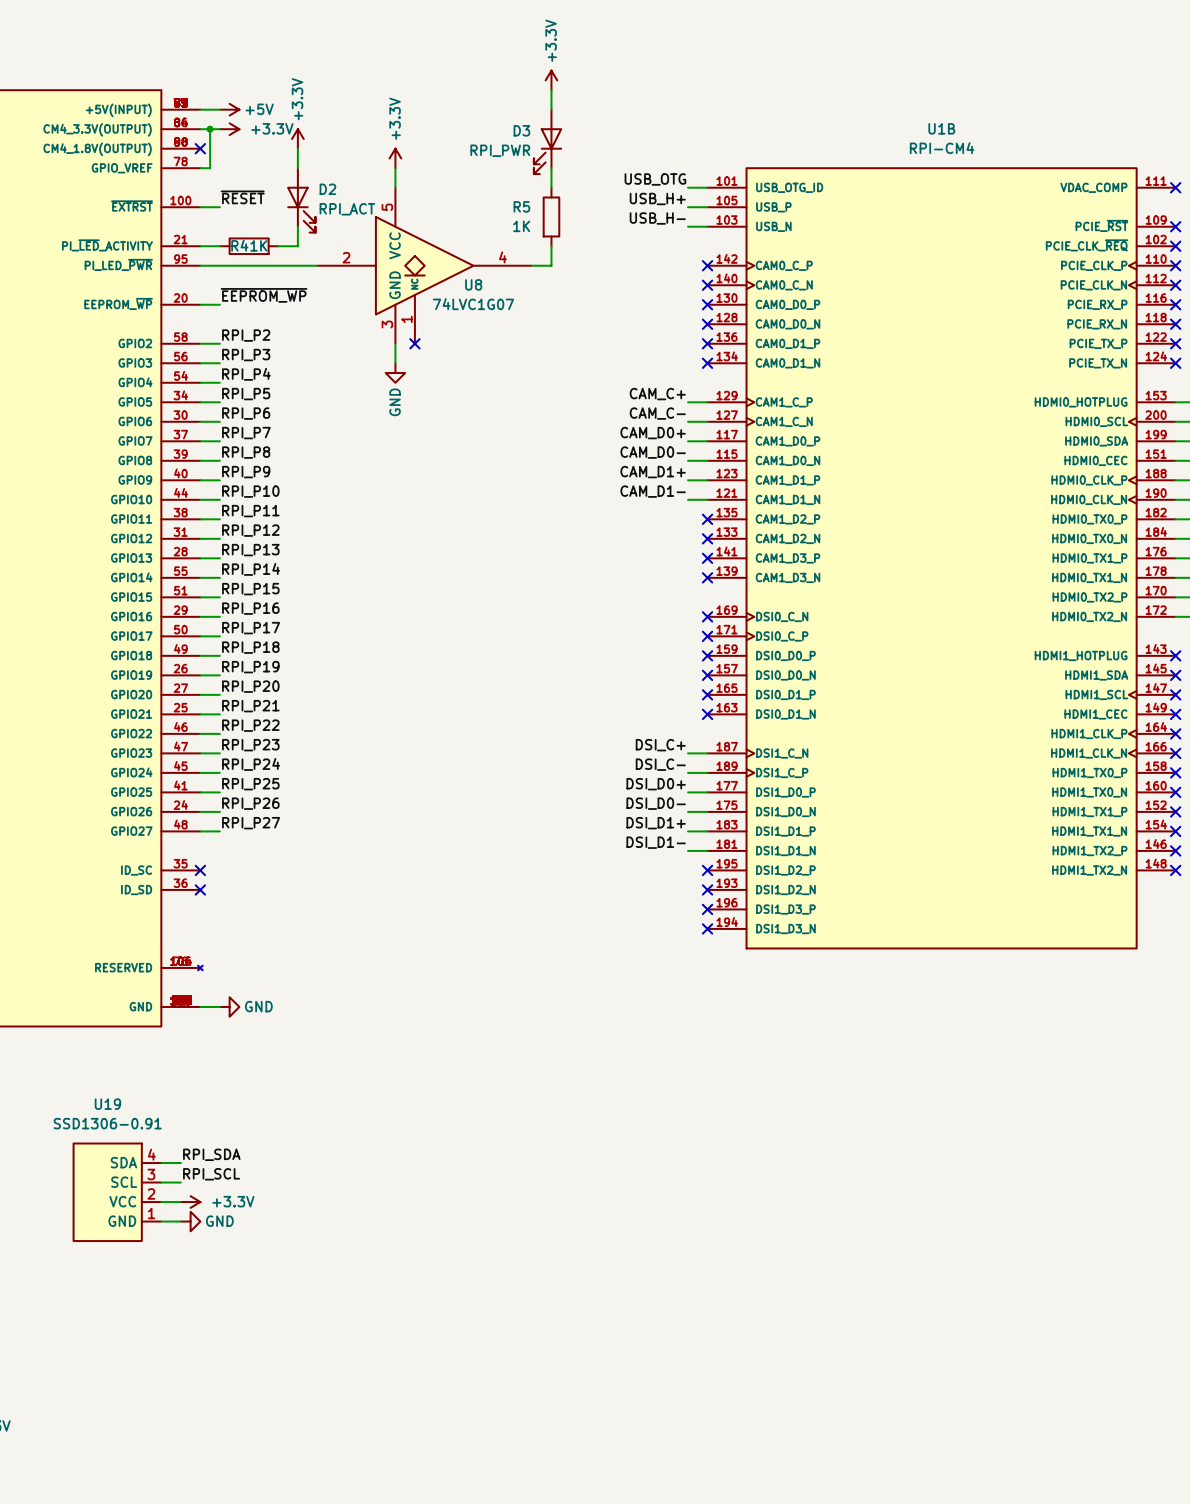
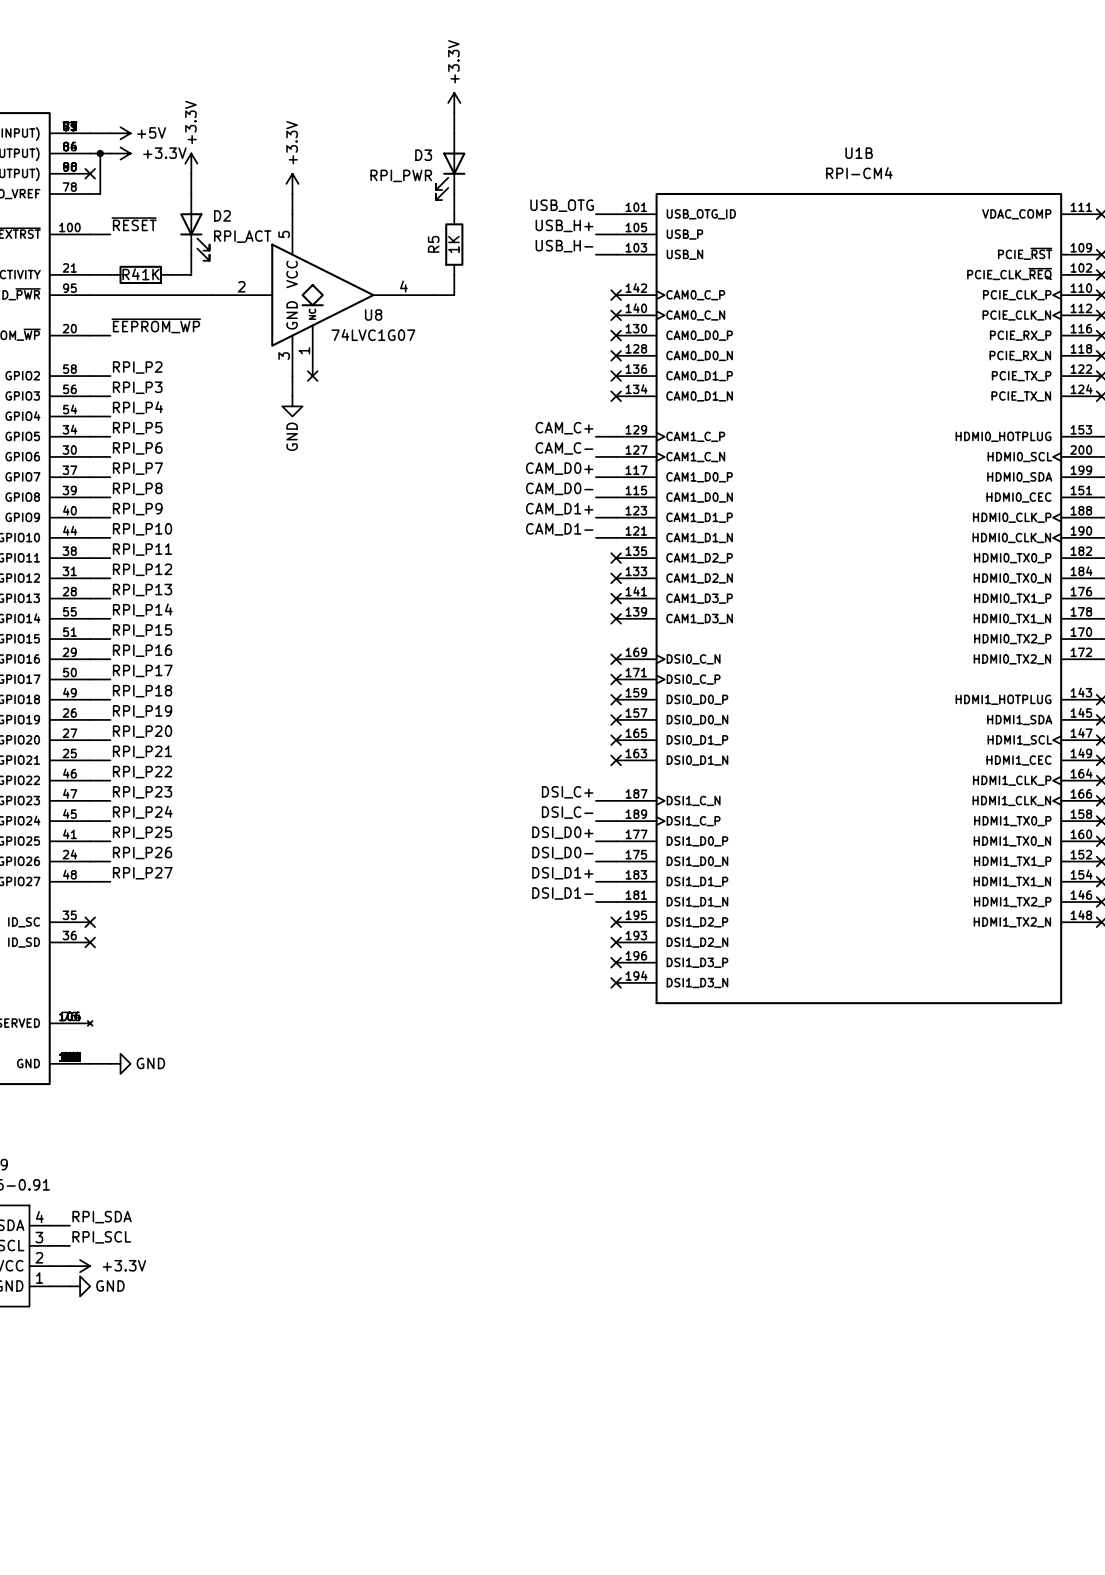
R5 name rotation: 0° (521, 206) -> 90° counterclockwise (433, 244)
R5 value rotation: 0° (521, 226) -> 90° counterclockwise (453, 244)
R5 value position: 1K (521, 226) -> 1K (453, 244)

